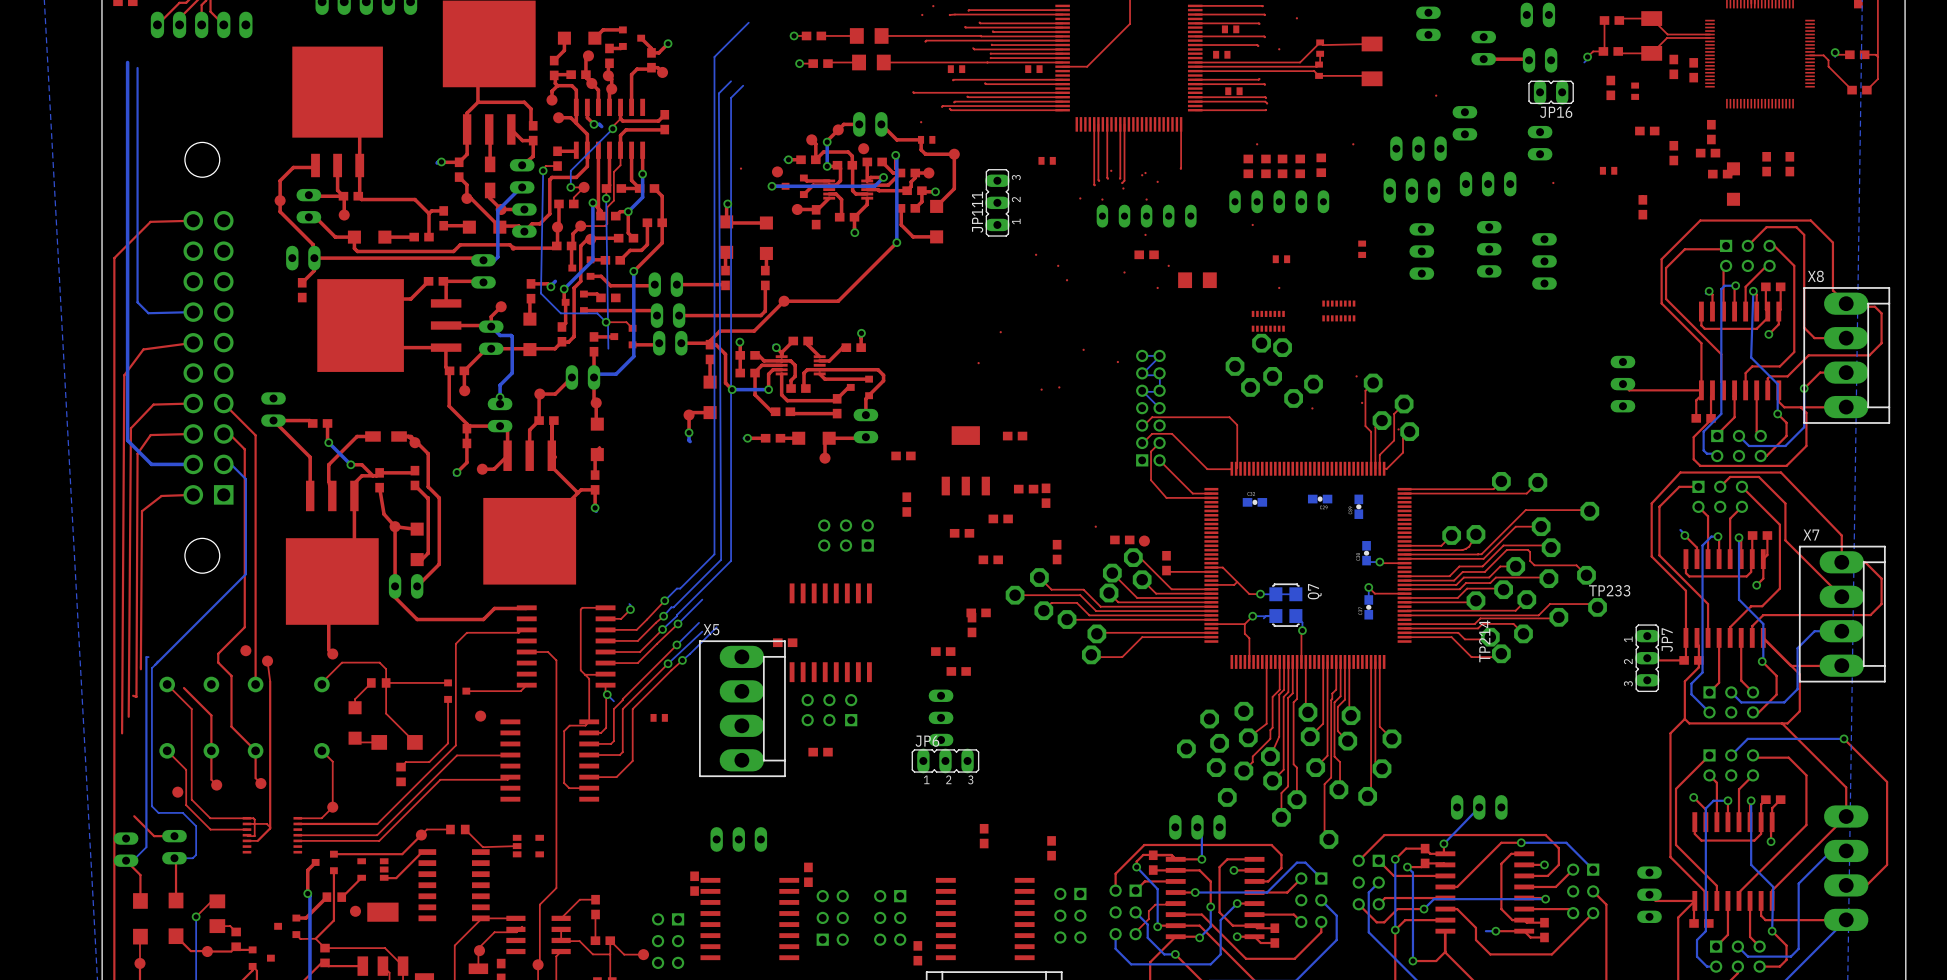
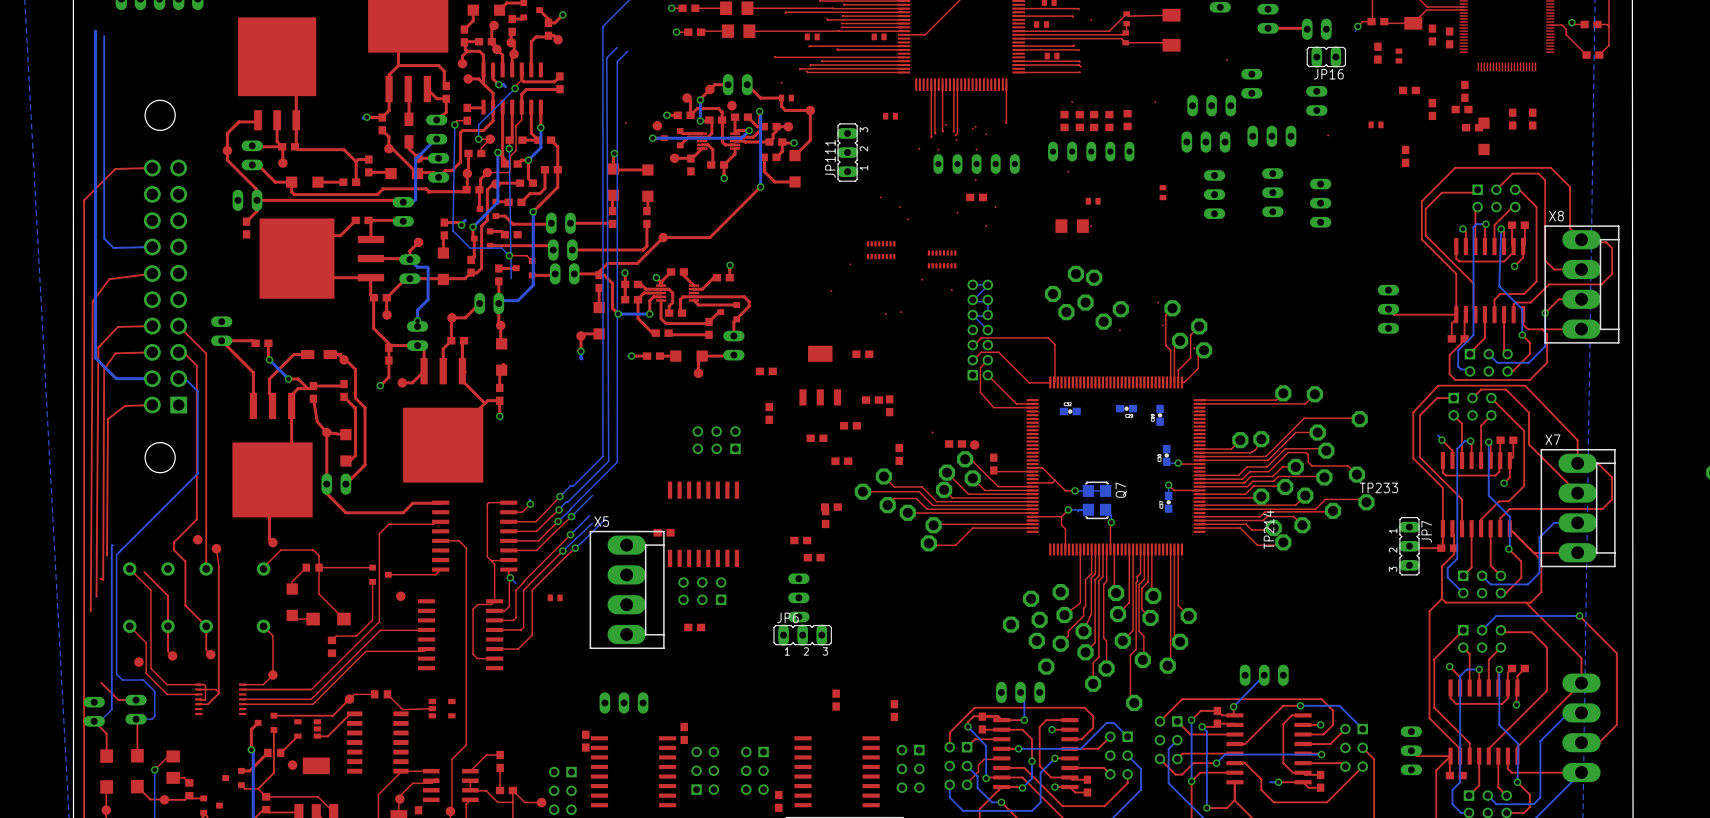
part position: (1197, 280) -> (1072, 226)
part: (1338, 310) -> none
part: none -> (881, 250)
part: (1268, 321) -> none
part: none -> (942, 259)

